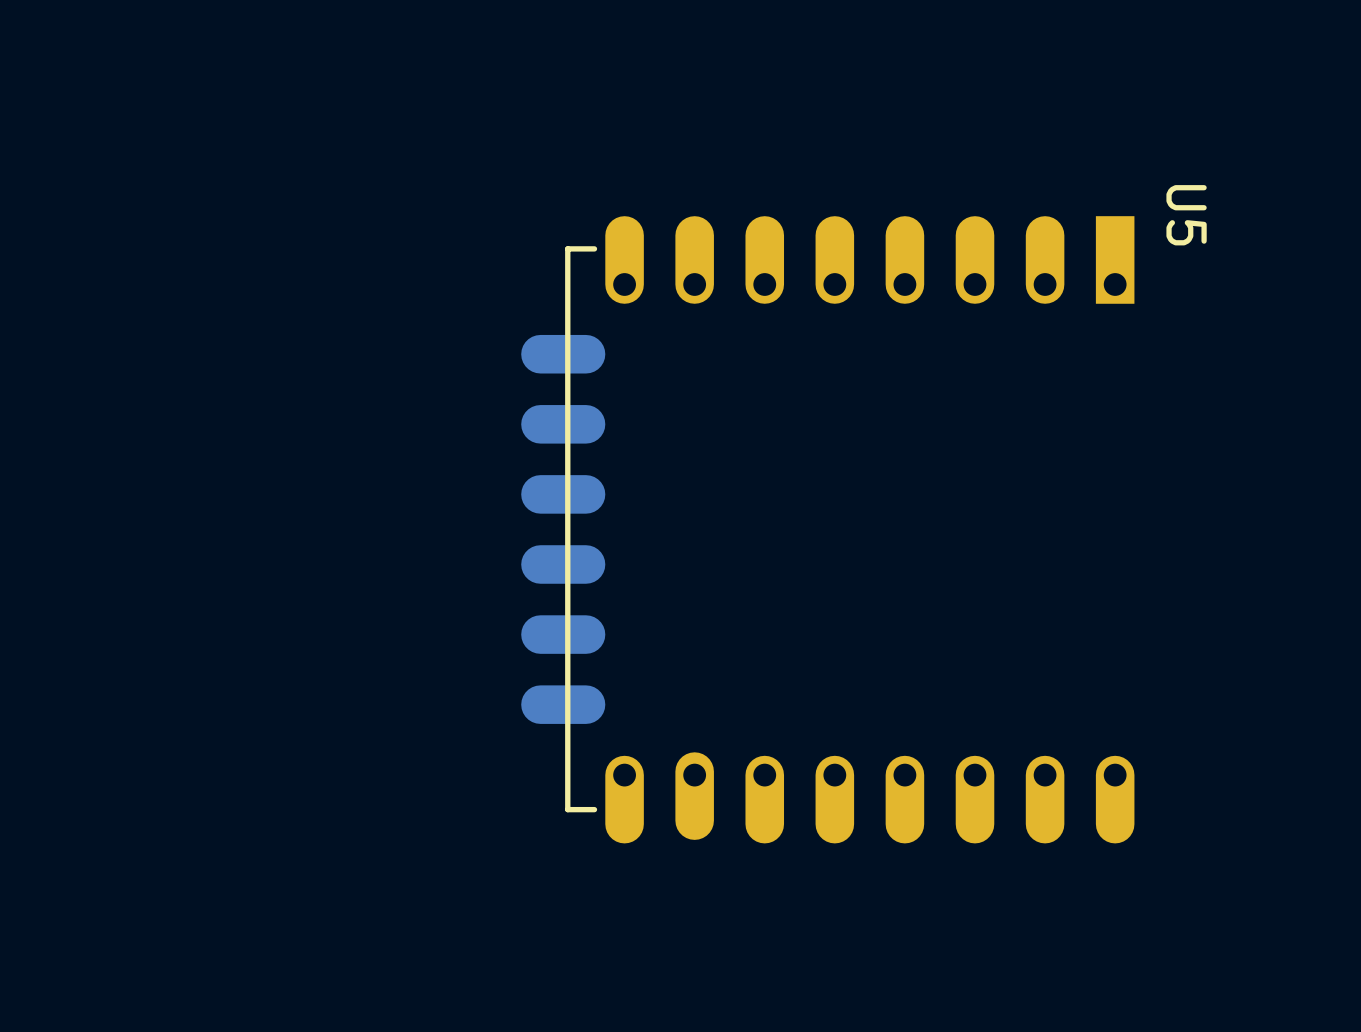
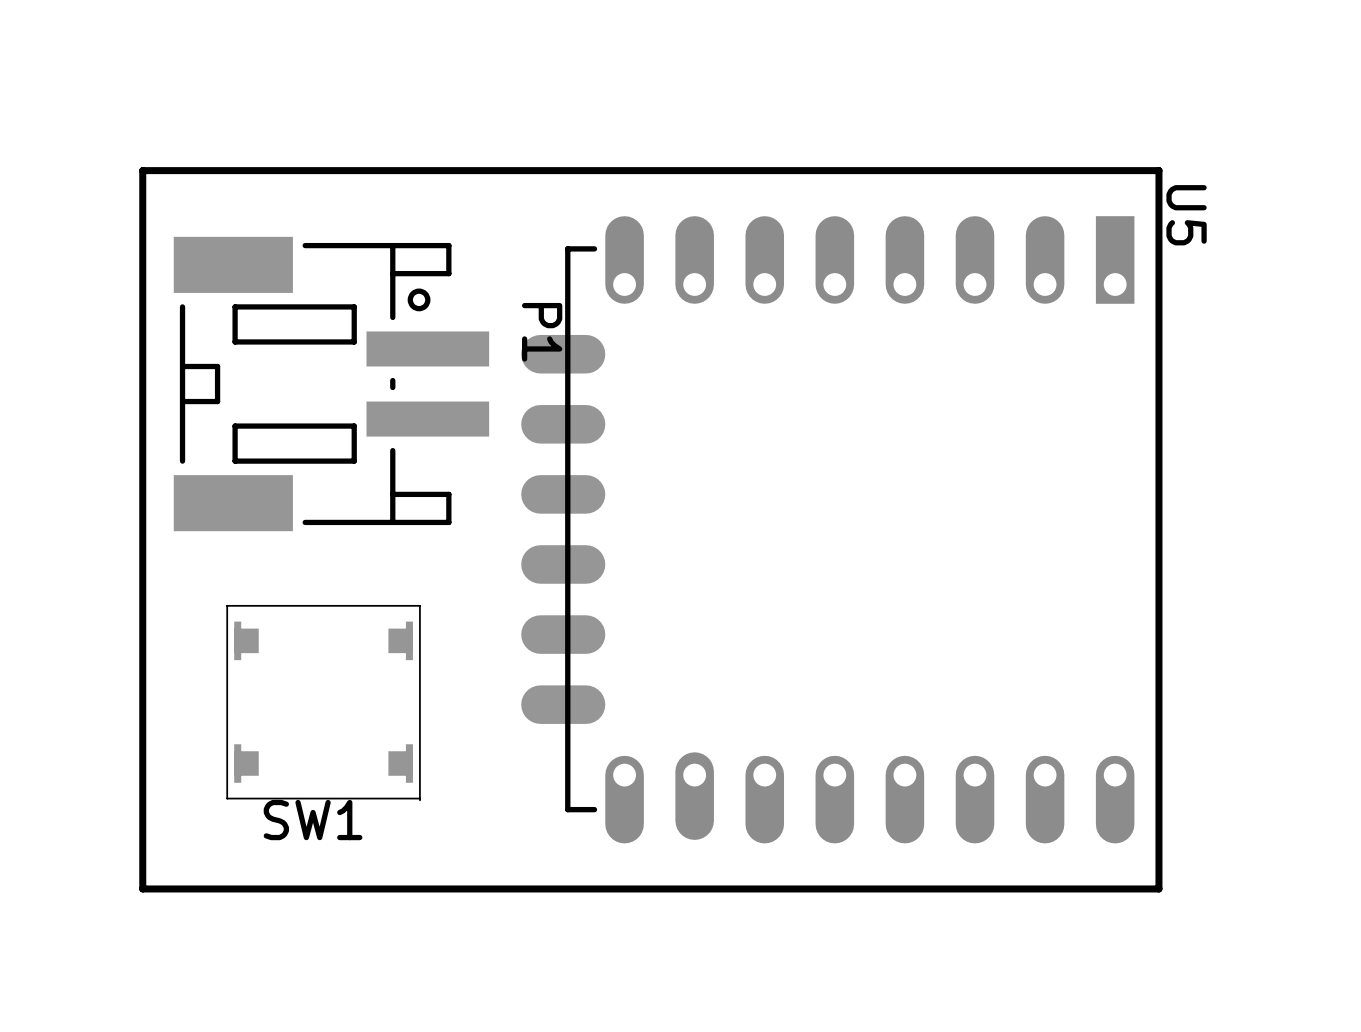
board edge: none -> (1158, 170) (142, 170) (142, 888) (1158, 888) (1158, 170)
P1: none -> (331, 384)
SW1: none -> (323, 703)

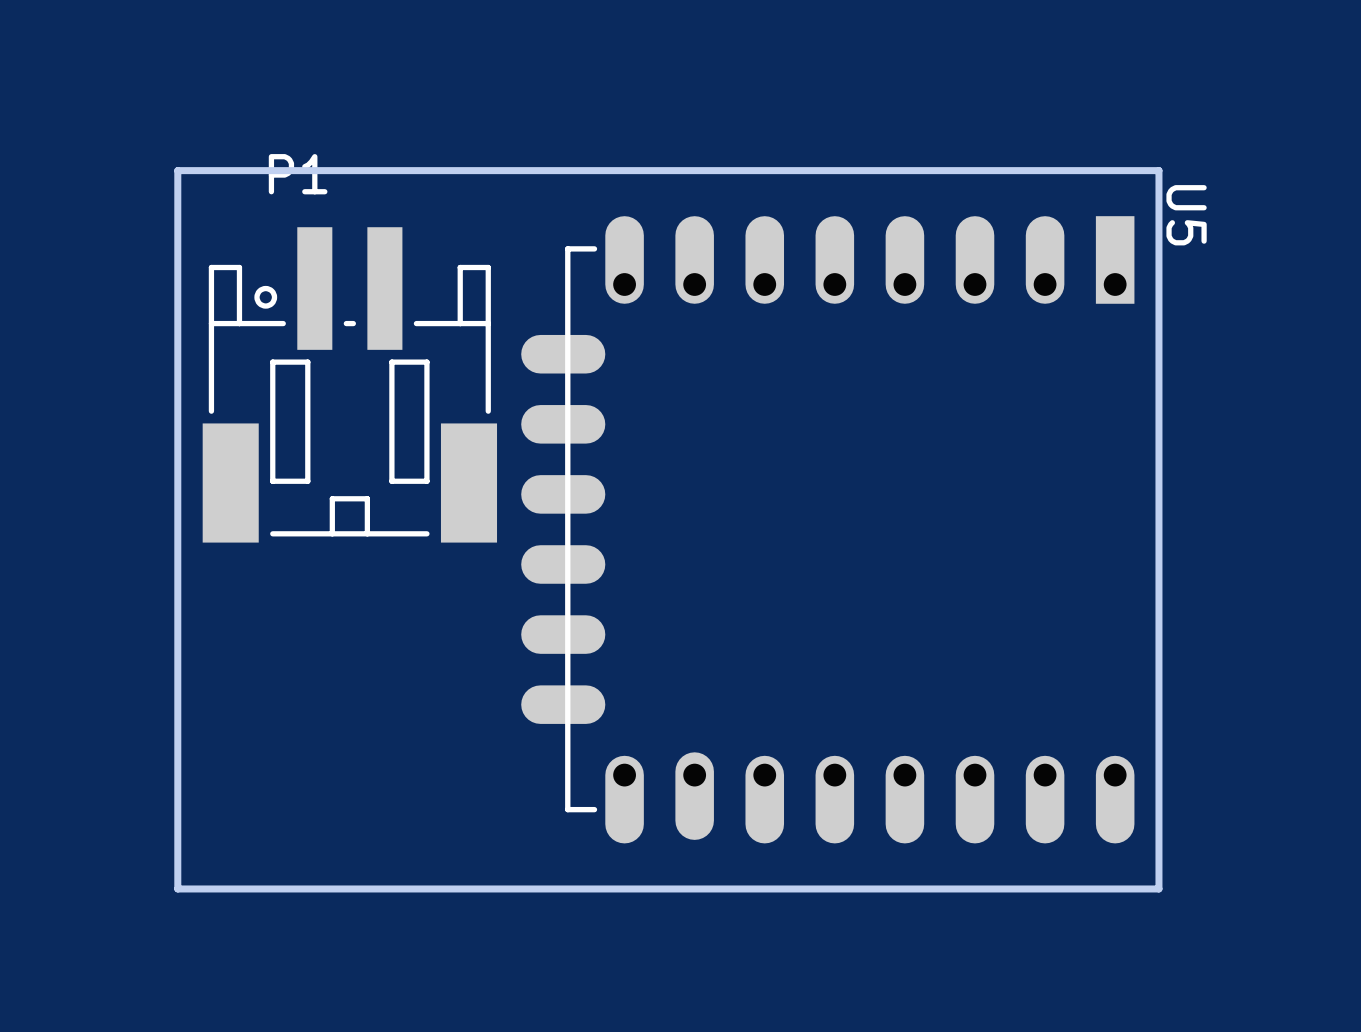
board edge: (177, 170) (142, 170) (142, 888) (177, 888) -> (177, 170) (177, 888)
P1 rotation: 0° (331, 384) -> 90° counterclockwise (349, 384)
SW1: (323, 703) -> none

